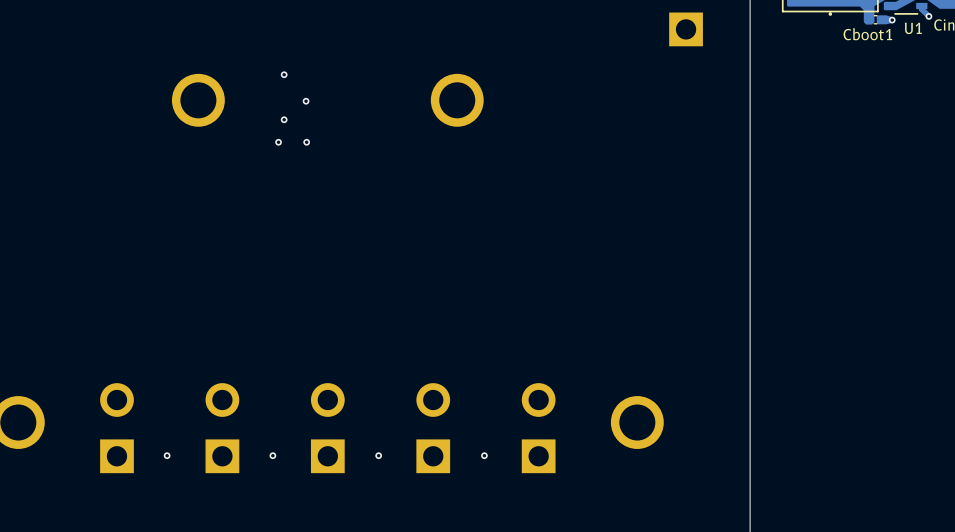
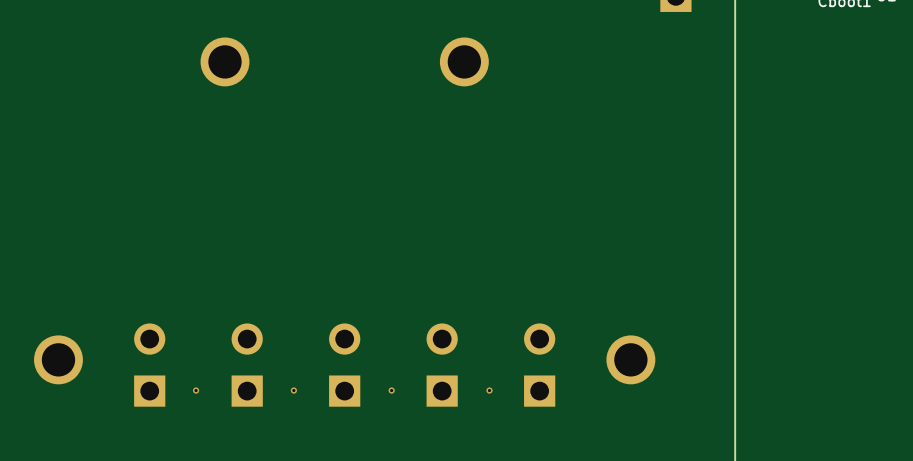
via: (284, 74) -> none
via: (306, 101) -> none
via: (284, 119) -> none
via: (278, 142) -> none
via: (306, 142) -> none

